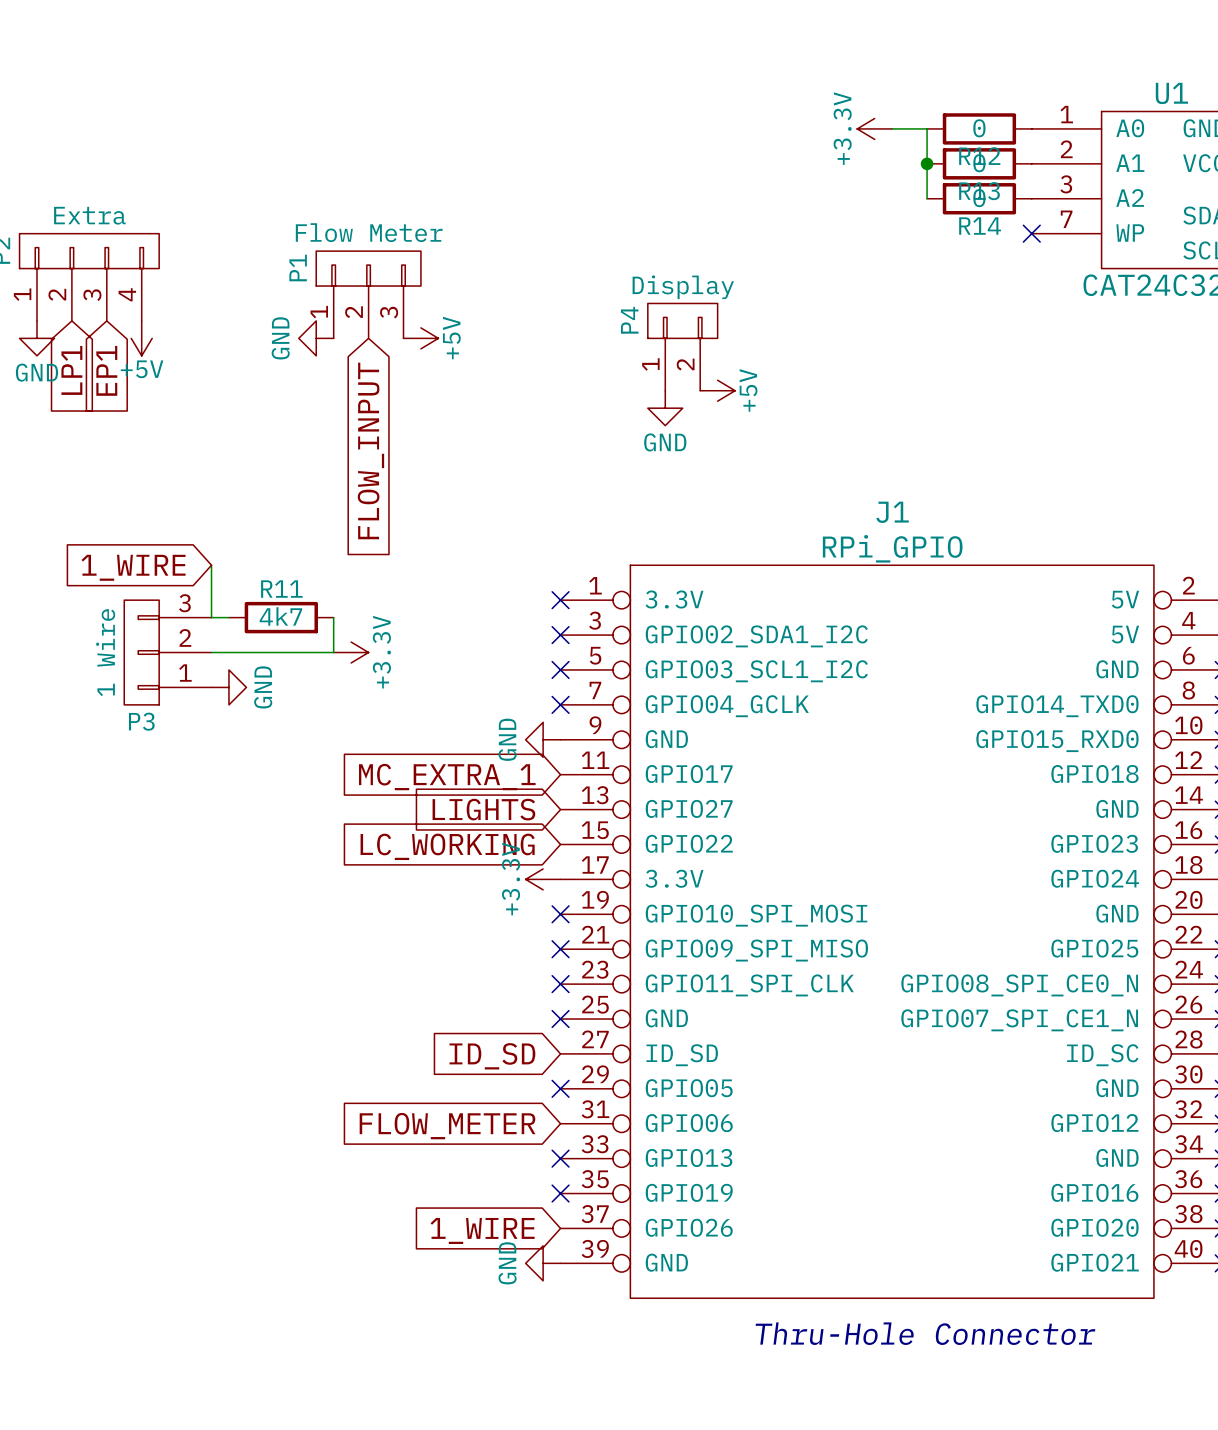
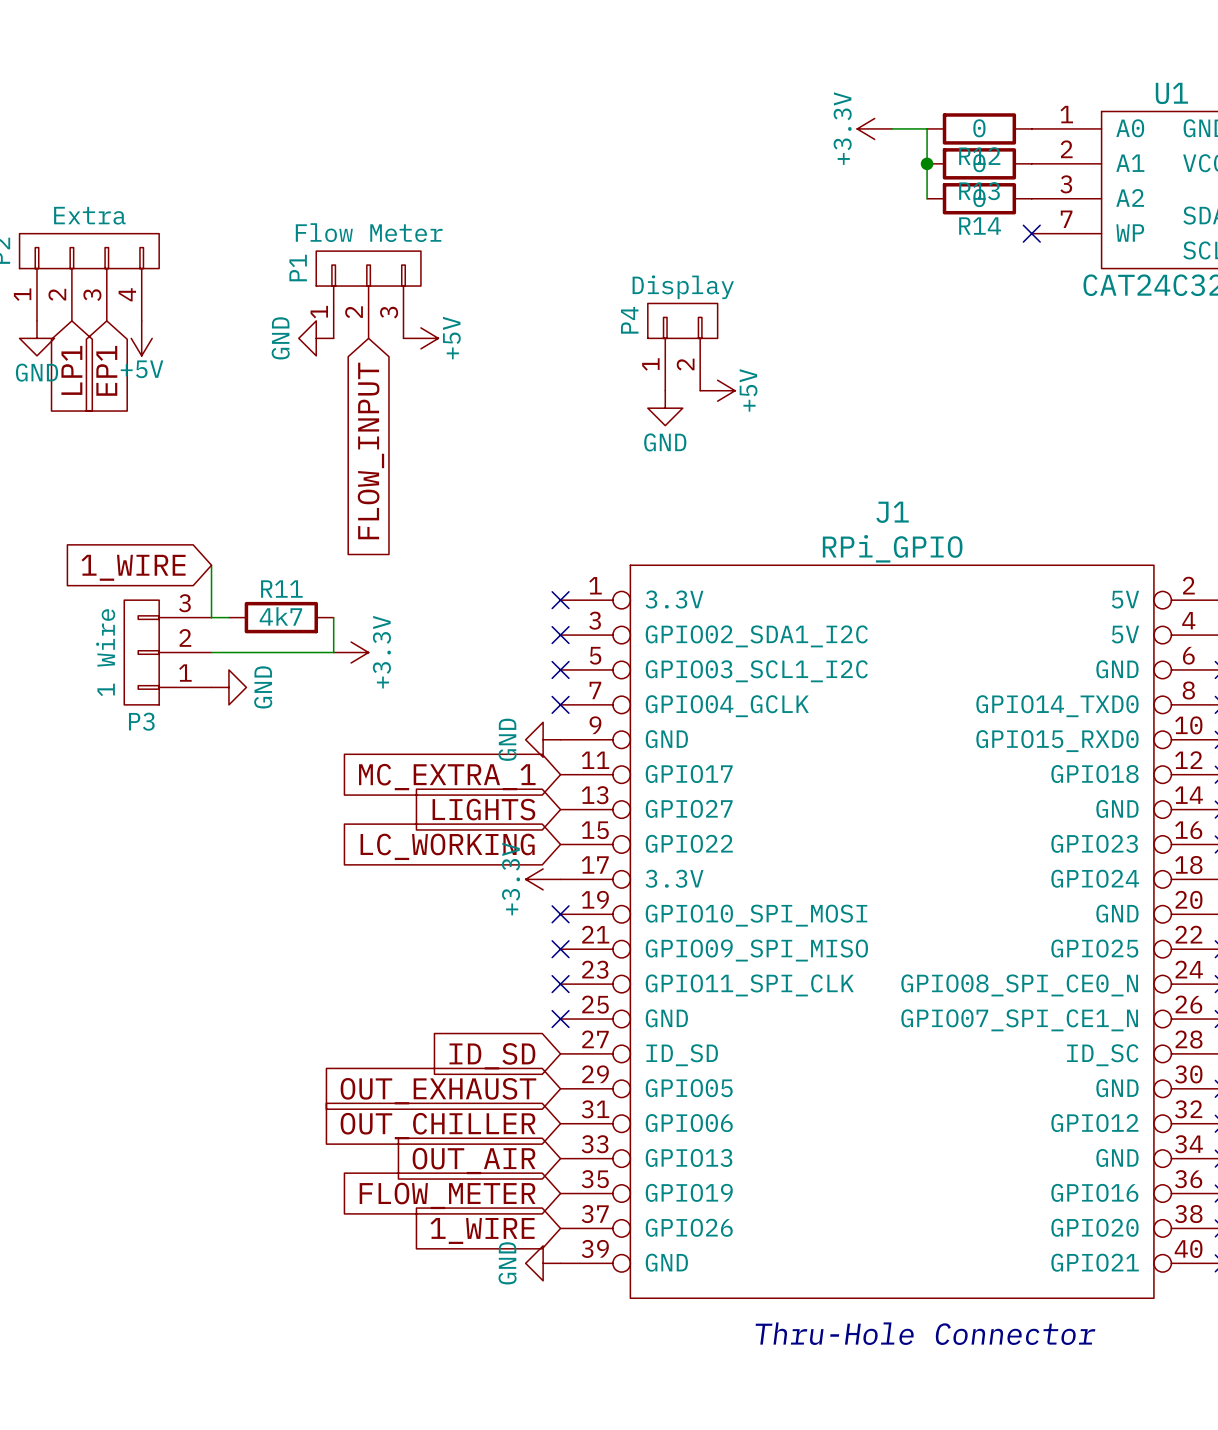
no-connect mark: (560, 1088) -> none
global label: none -> OUT_EXHAUST (438, 1091)
global label: FLOW_METER (447, 1126) -> OUT_CHILLER (438, 1126)
no-connect mark: (560, 1158) -> none
global label: none -> OUT_AIR (474, 1160)
no-connect mark: (560, 1193) -> none
global label: none -> FLOW_METER (447, 1195)

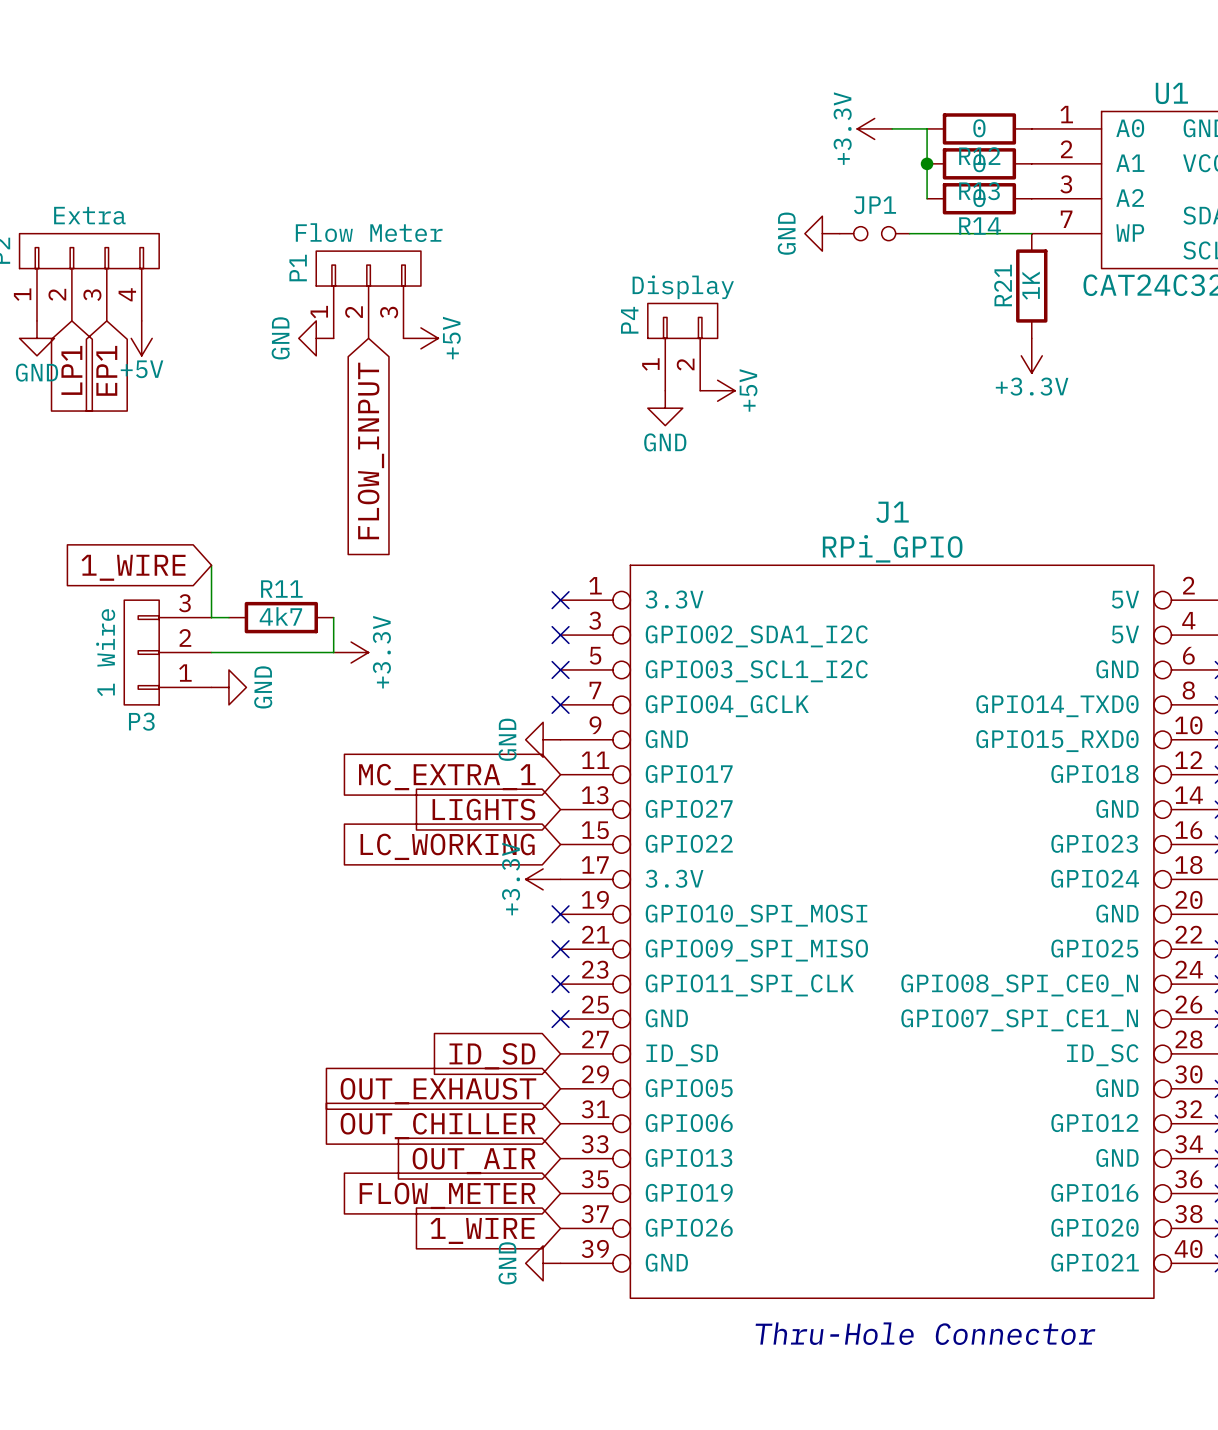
power symbol: none -> GND (822, 233)
JP1: none -> (874, 233)
wire: none -> (909, 233) (1031, 233)
no-connect mark: (1031, 233) -> none
R21: none -> 1K (1031, 286)
power symbol: none -> +3.3V (1031, 355)

